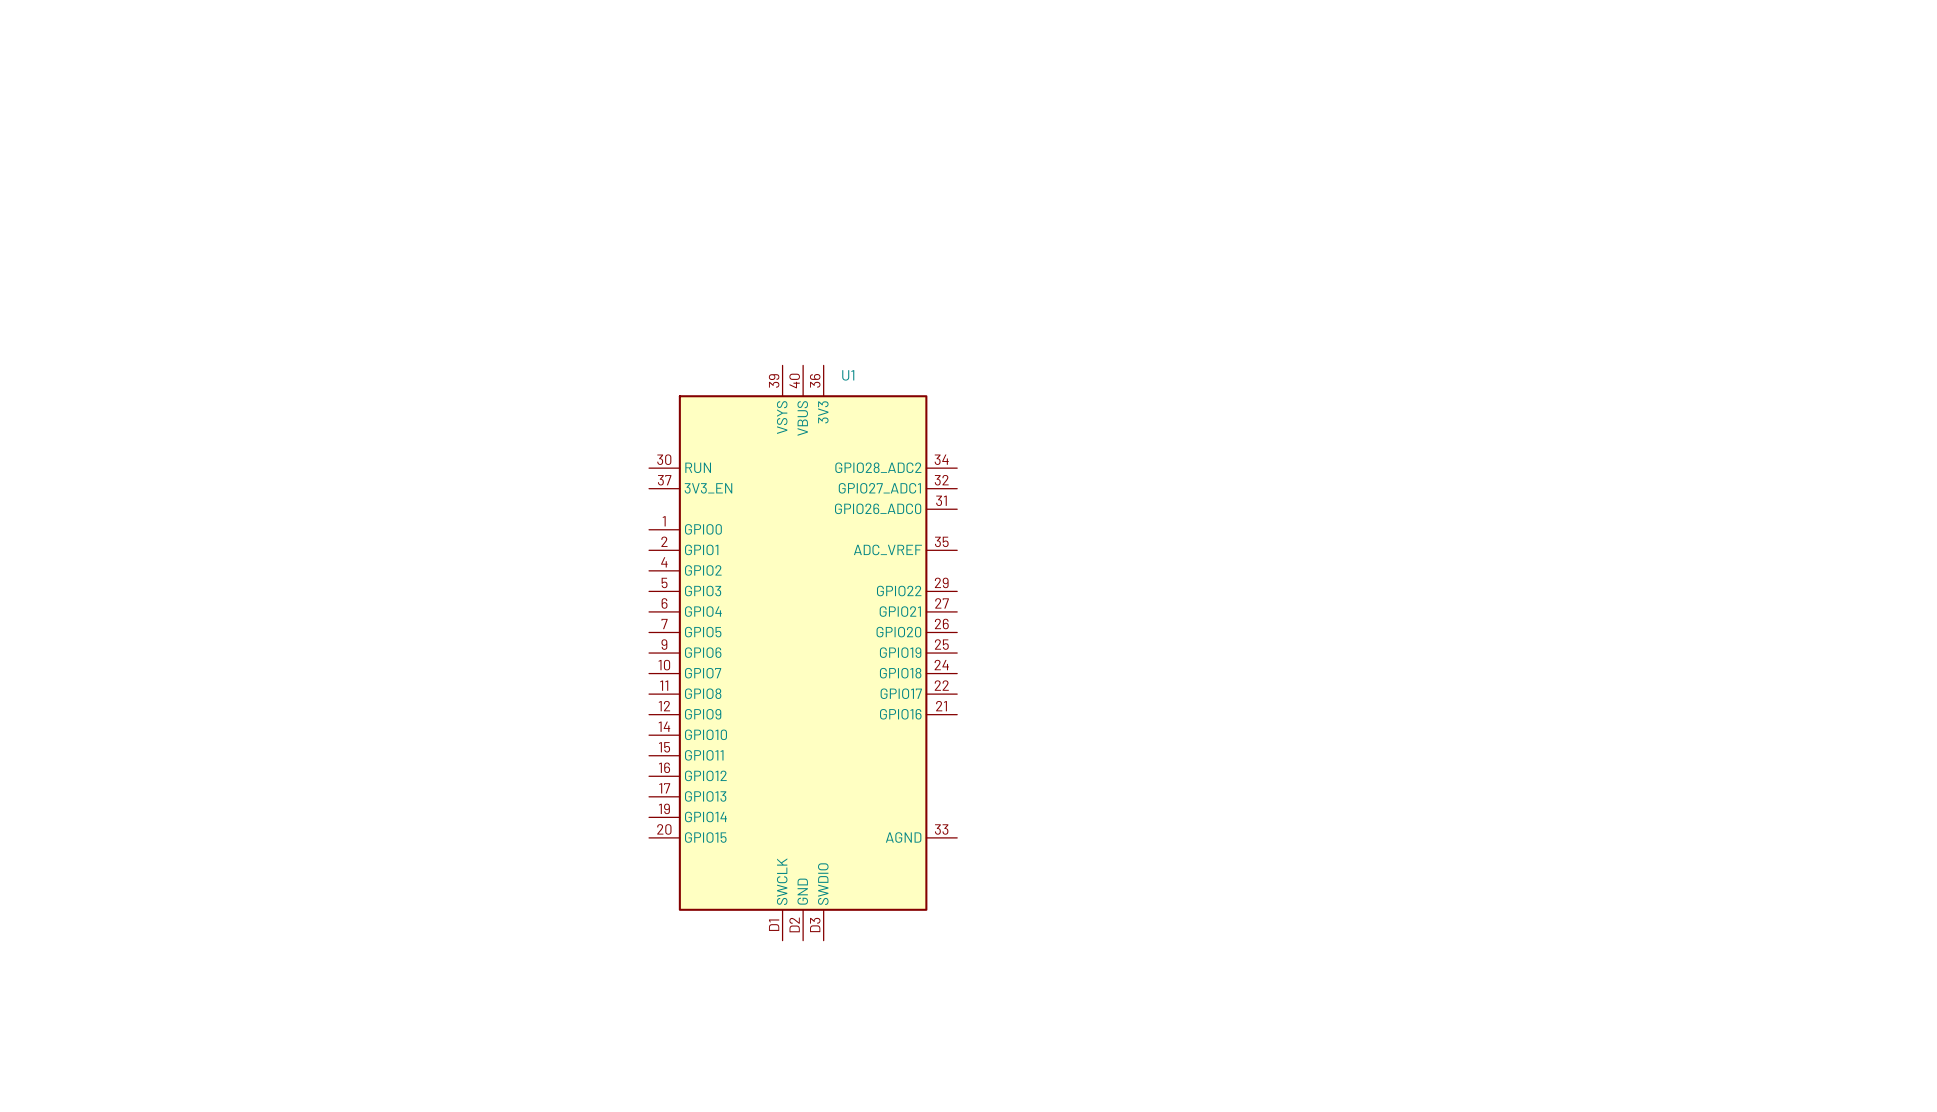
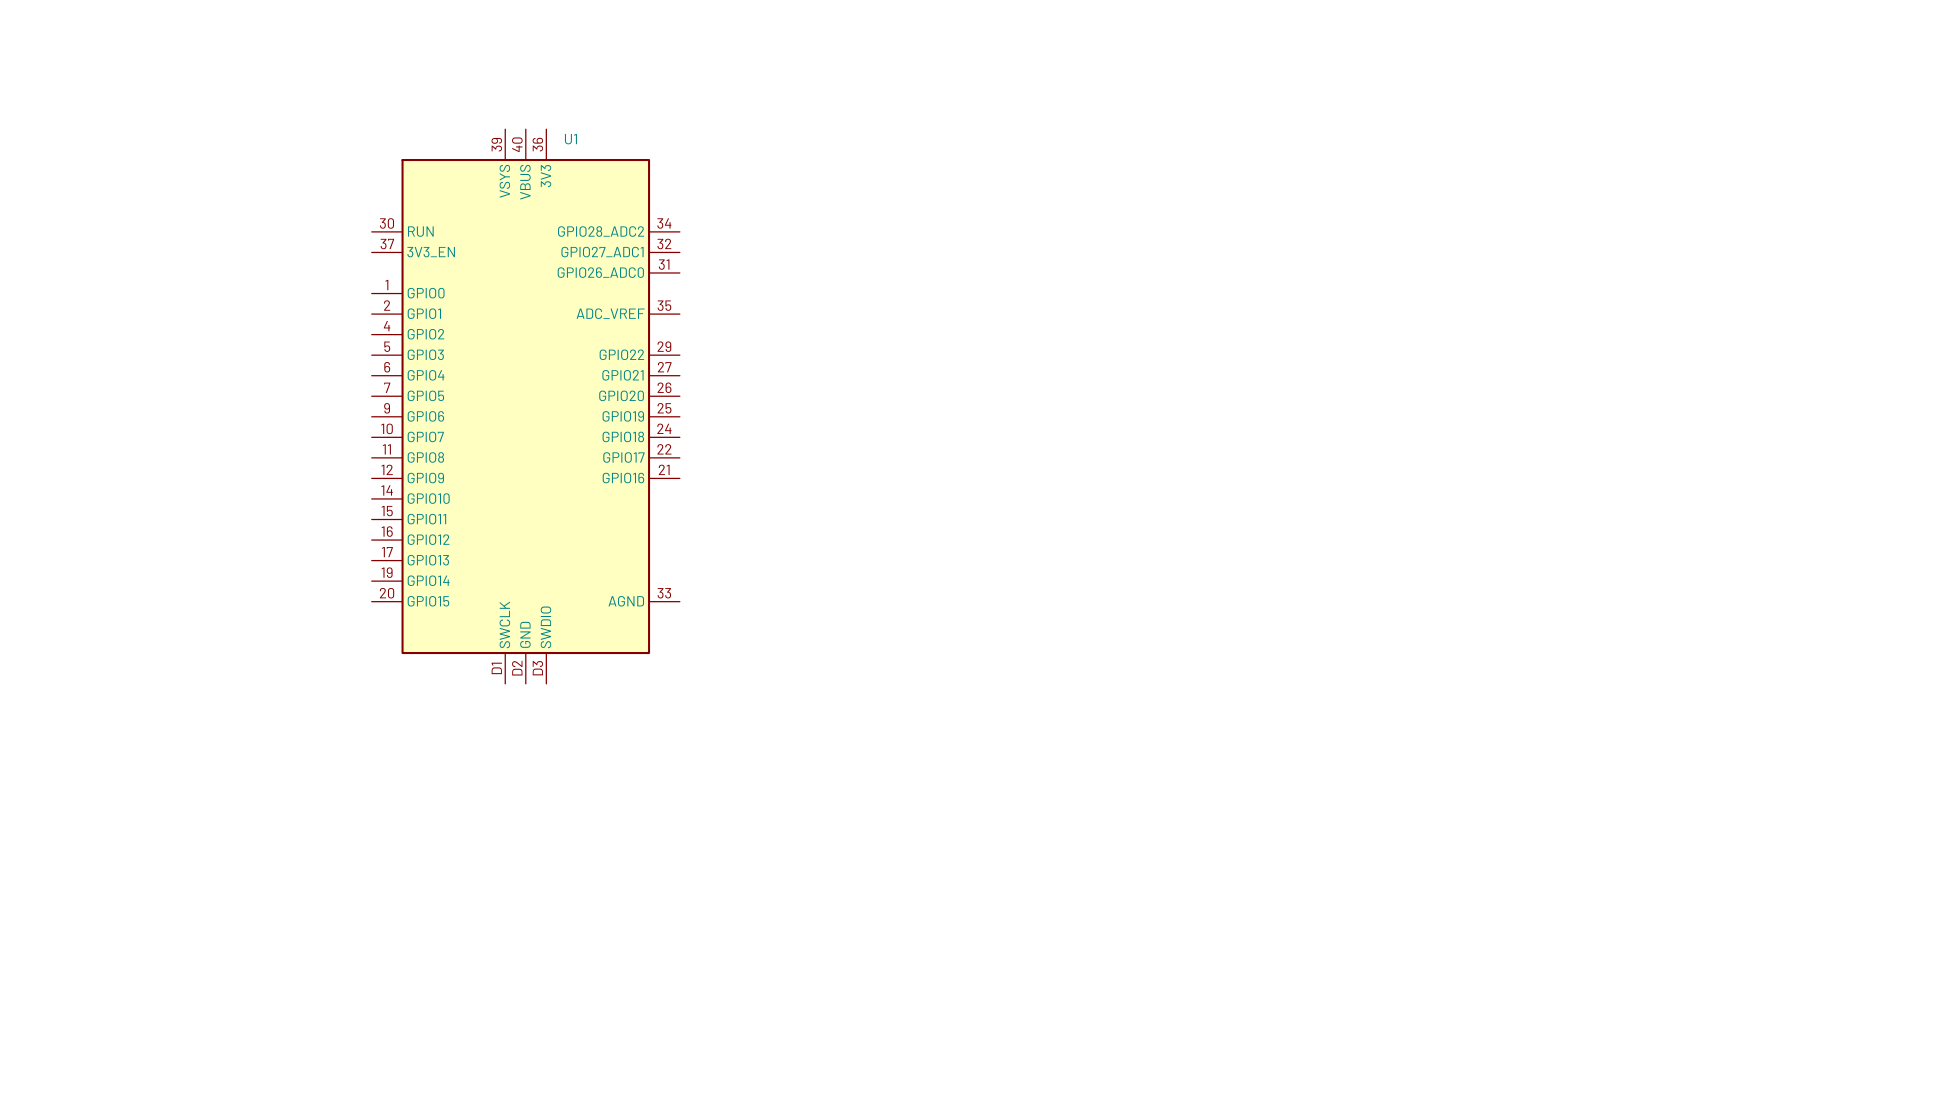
U1 symbol: [649, 365, 958, 941] -> [371, 129, 680, 684]

